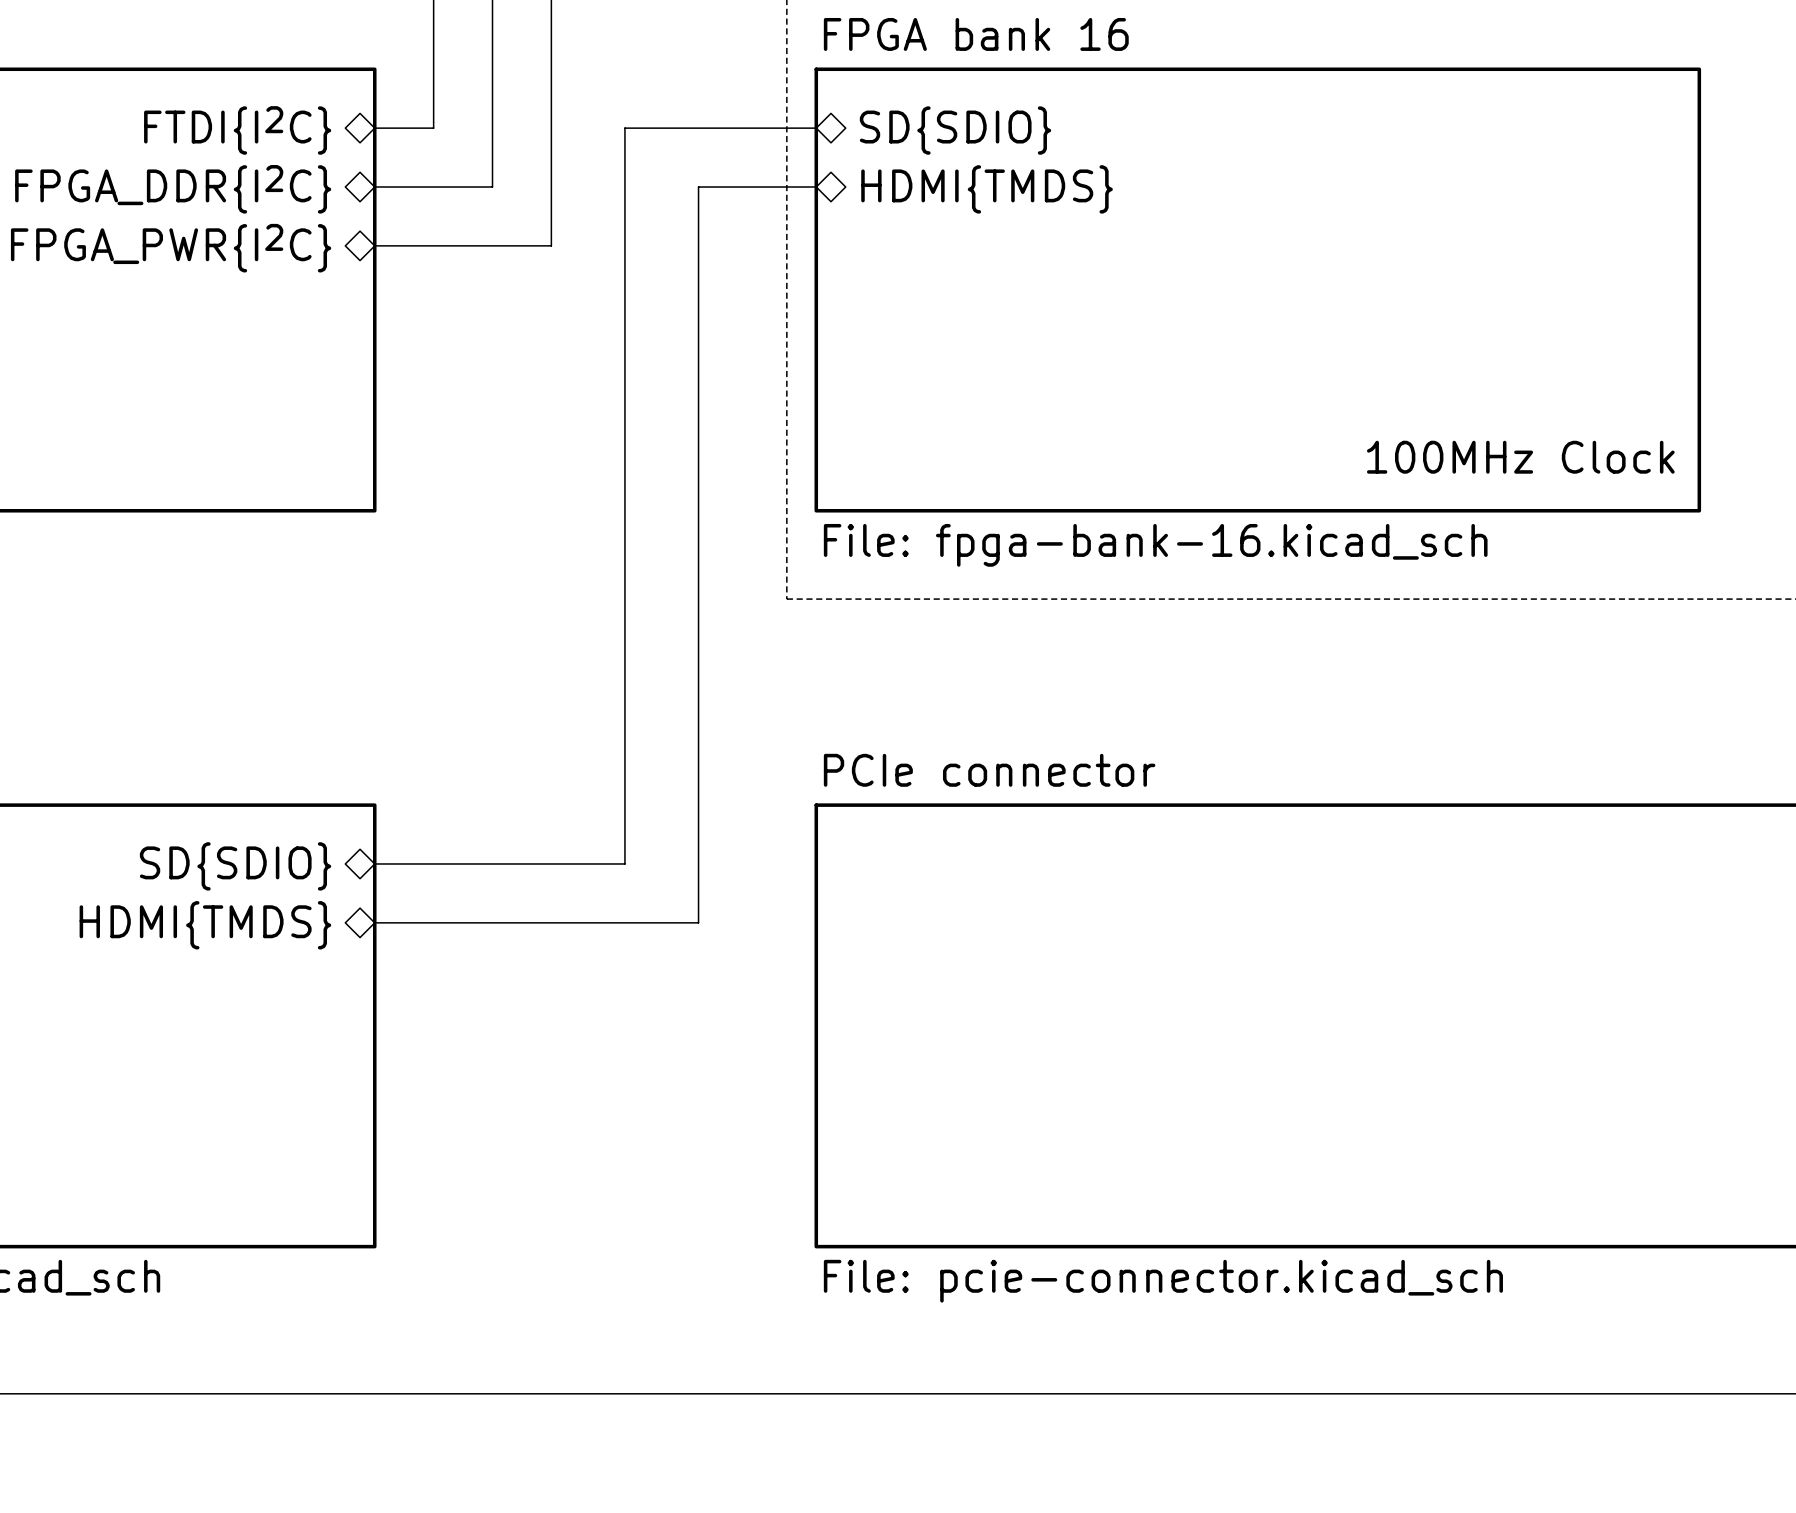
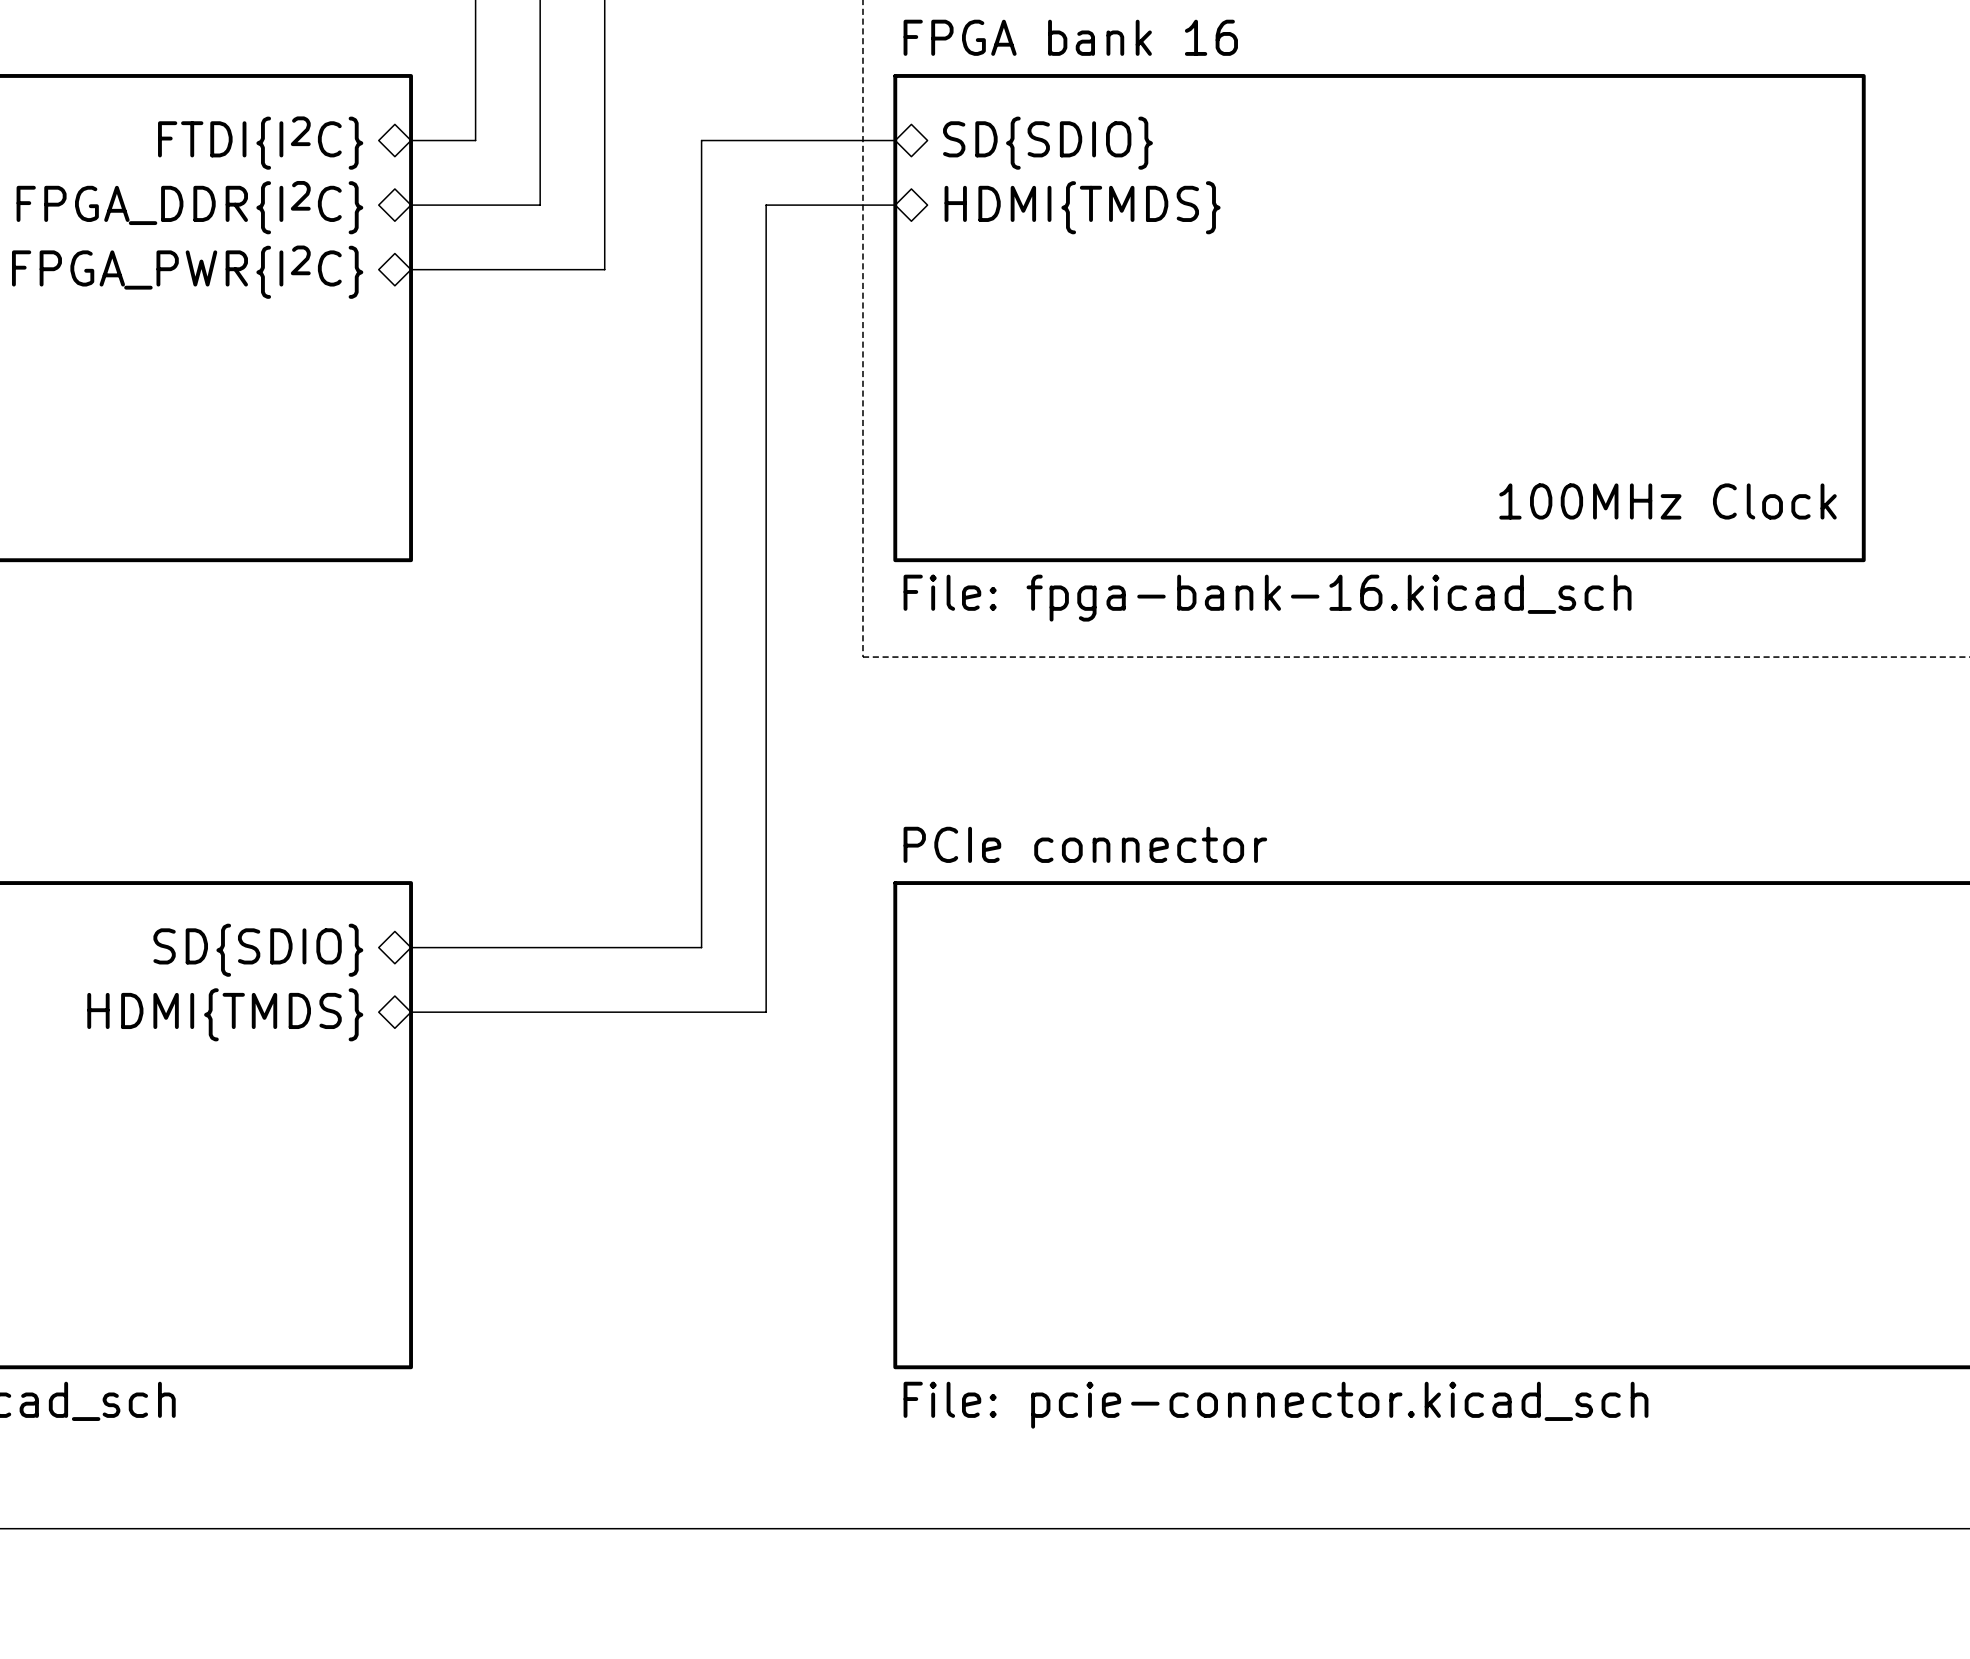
bus: (639, 128) (624, 128) (624, 863) -> (701, 140) (701, 947) (685, 947)

